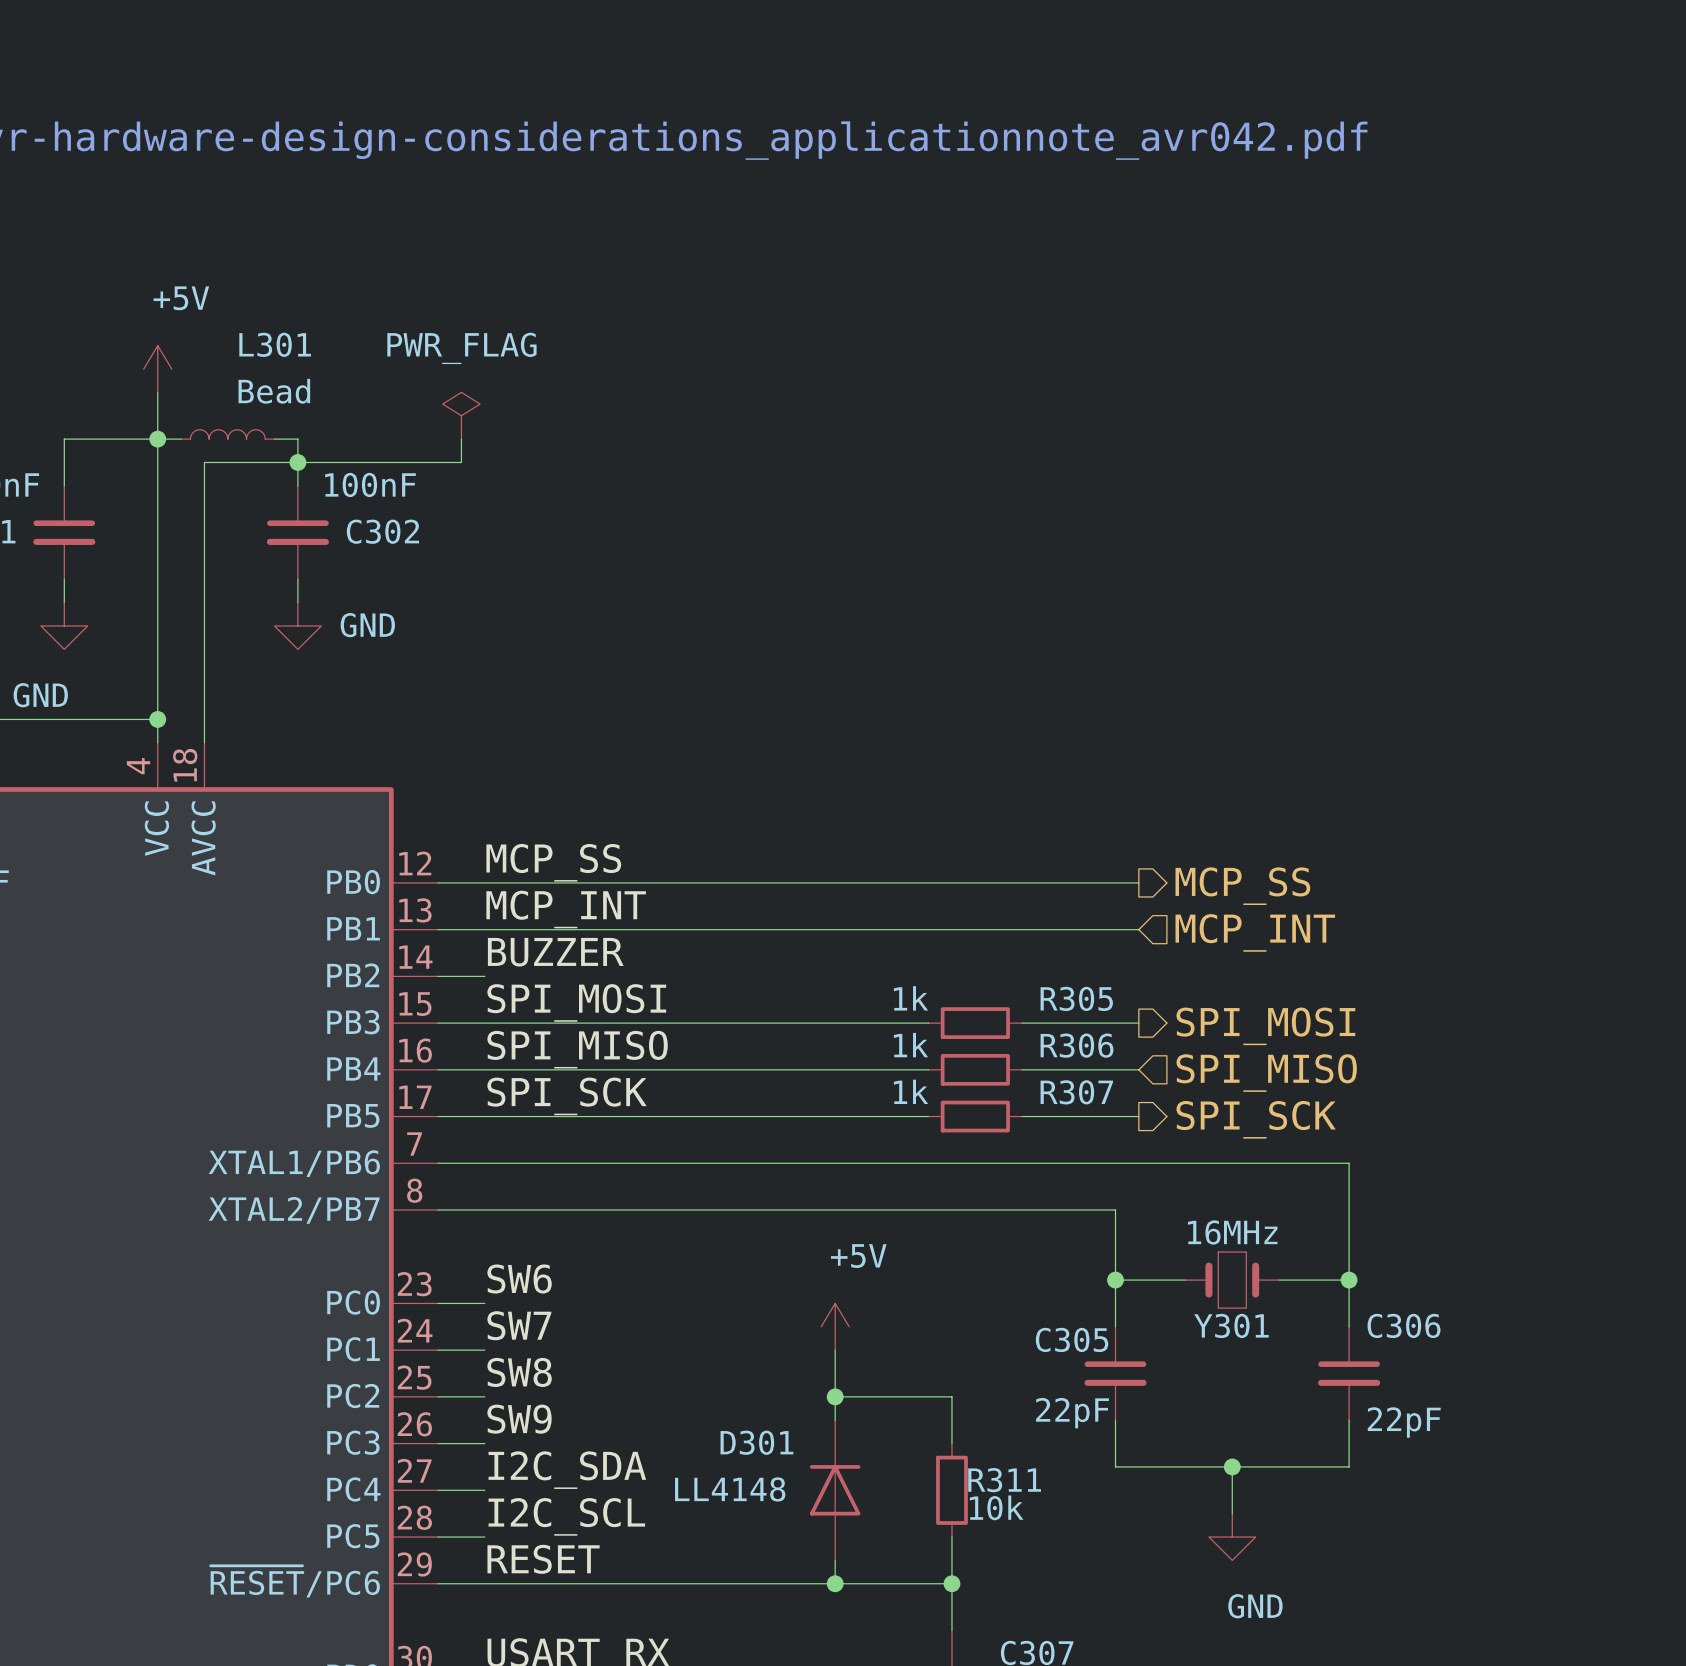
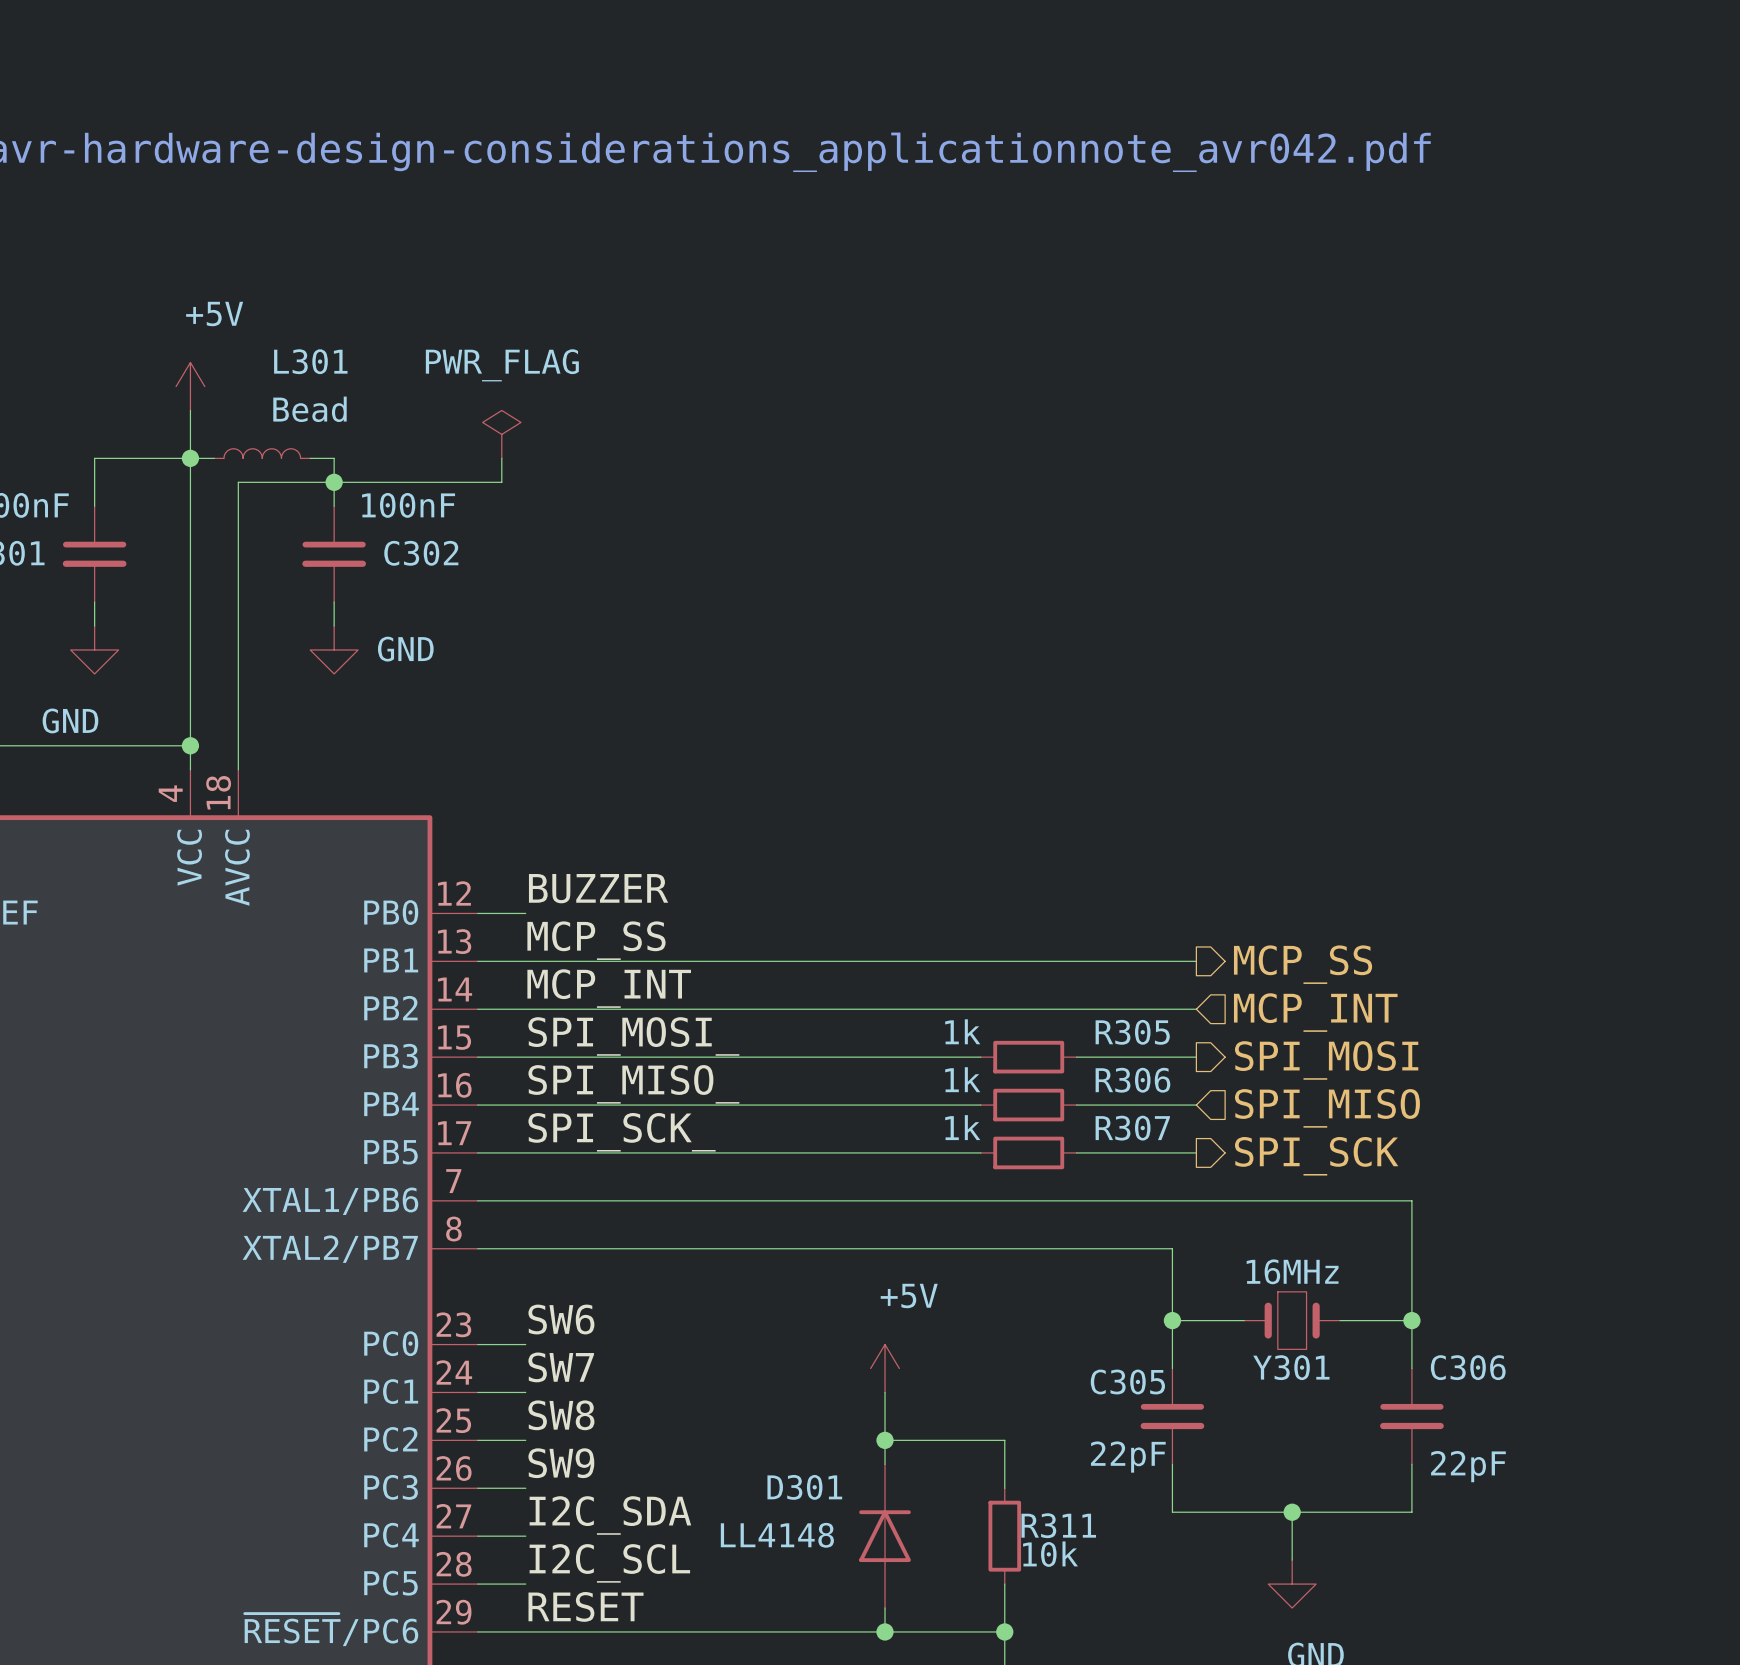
label: MCP_SS (553, 862) -> BUZZER (598, 888)
wire: (484, 882) (1138, 882) -> (525, 1009) (1196, 1009)
hierarchical label: MCP_SS (1242, 886) -> none
label: MCP_INT (566, 909) -> MCP_SS (596, 940)
hierarchical label shape: input (1255, 932) -> output (1303, 964)
hierarchical label: MCP_INT (1255, 932) -> MCP_SS (1303, 964)
label: BUZZER (555, 952) -> MCP_INT (609, 988)
hierarchical label: none -> MCP_INT (1315, 1012)
label: SPI_MOSI (576, 1002) -> SPI_MOSI_ (633, 1036)
label: SPI_MISO (577, 1049) -> SPI_MISO_ (633, 1084)
label: SPI_SCK (567, 1096) -> SPI_SCK_ (622, 1132)

